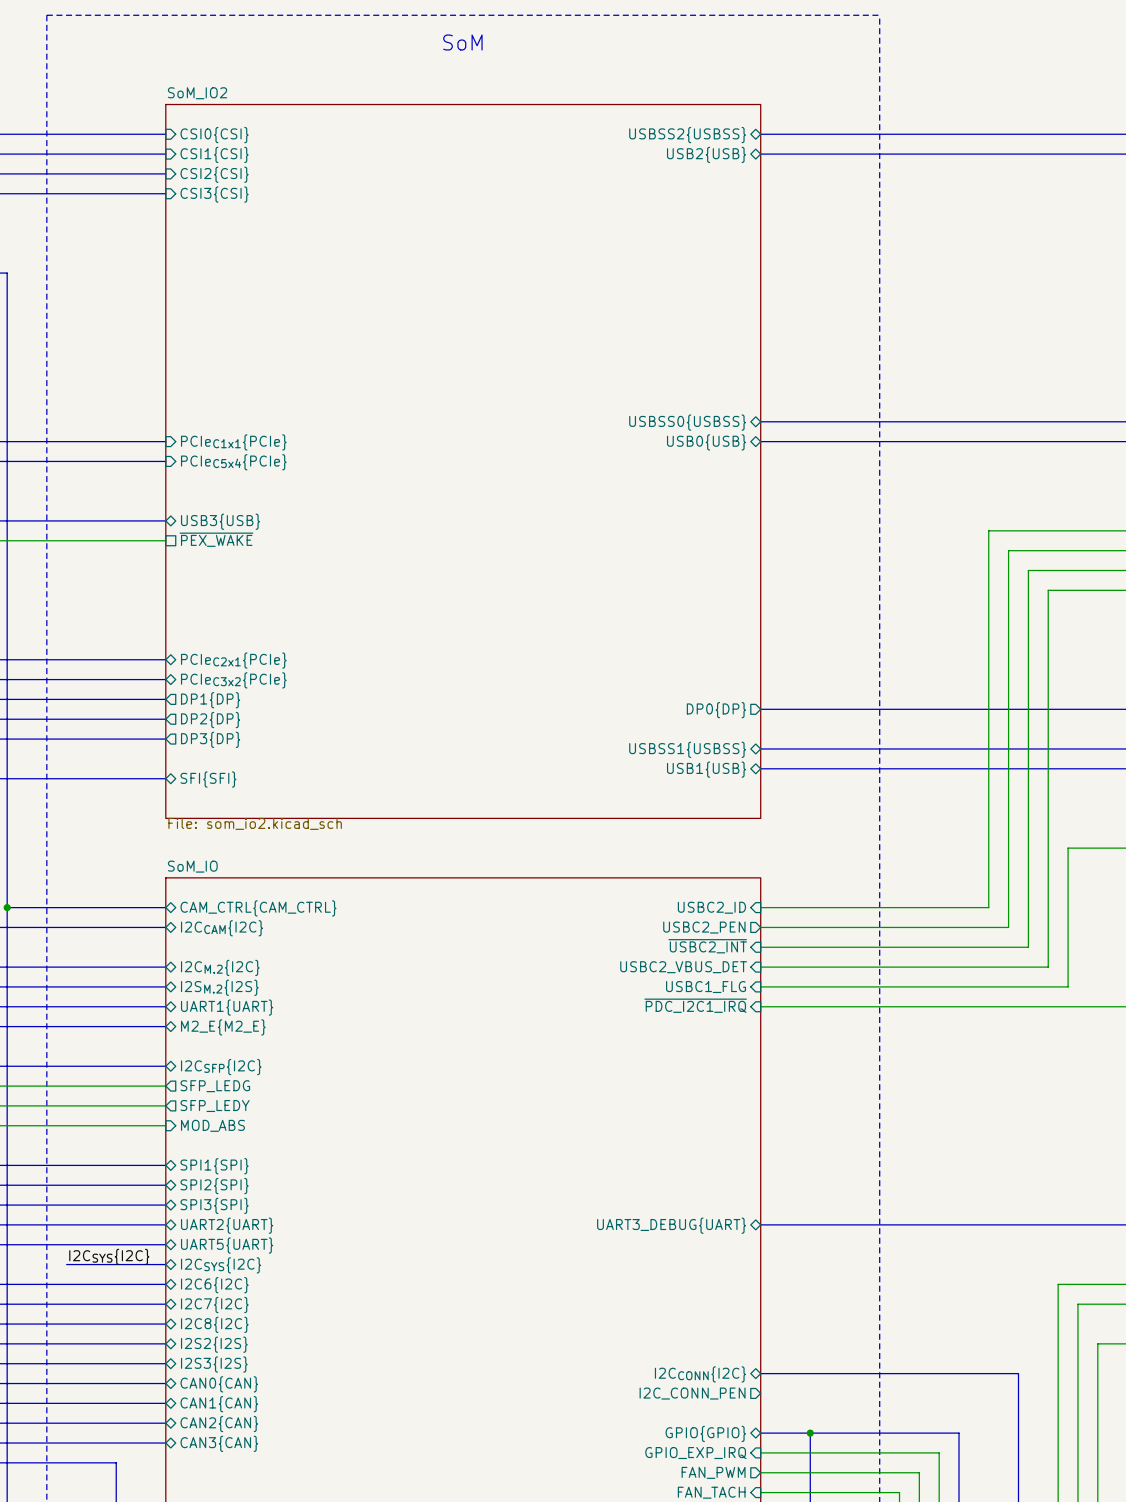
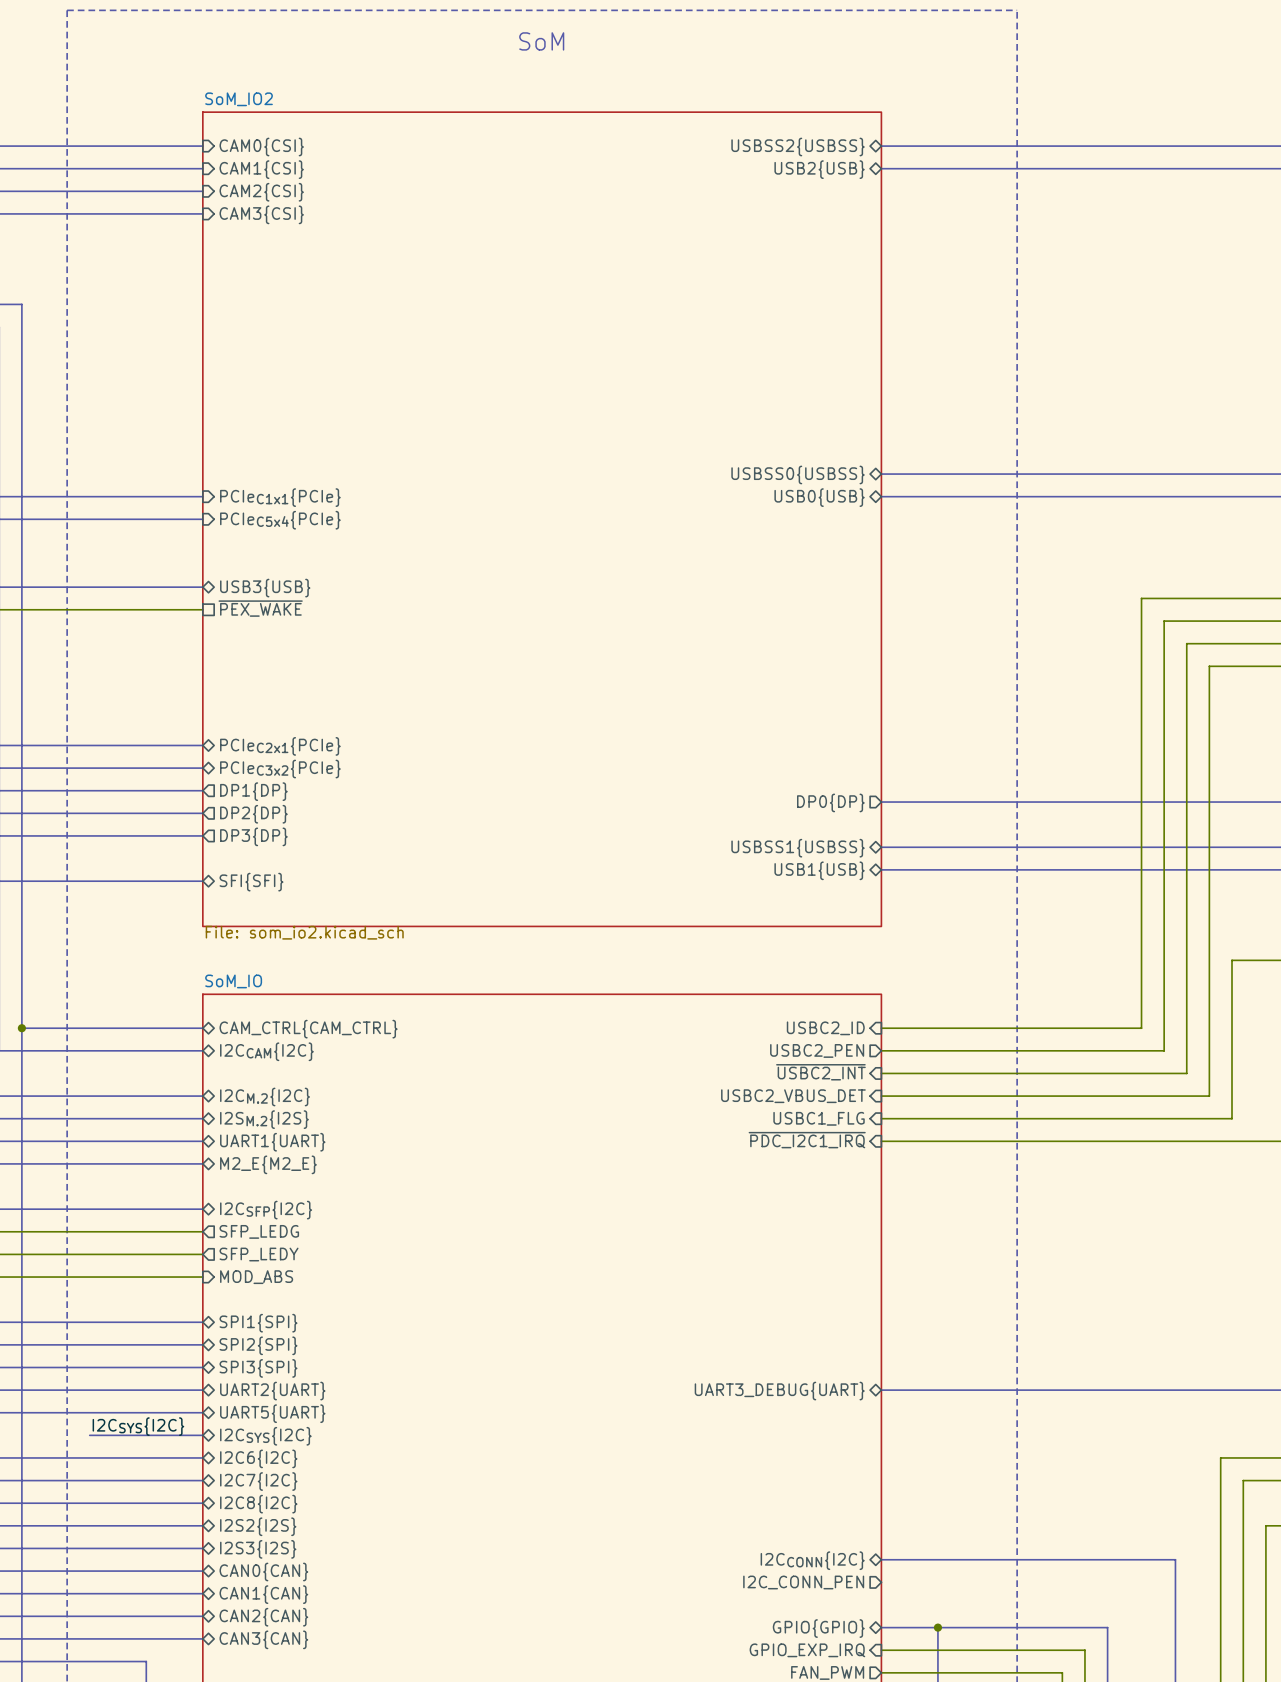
sheet pin: CSI0{CSI} (214, 135) -> CAM0{CSI} (261, 147)
sheet pin: CSI1{CSI} (214, 154) -> CAM1{CSI} (261, 169)
sheet pin: CSI2{CSI} (214, 174) -> CAM2{CSI} (261, 192)
sheet pin: CSI3{CSI} (214, 194) -> CAM3{CSI} (261, 214)

